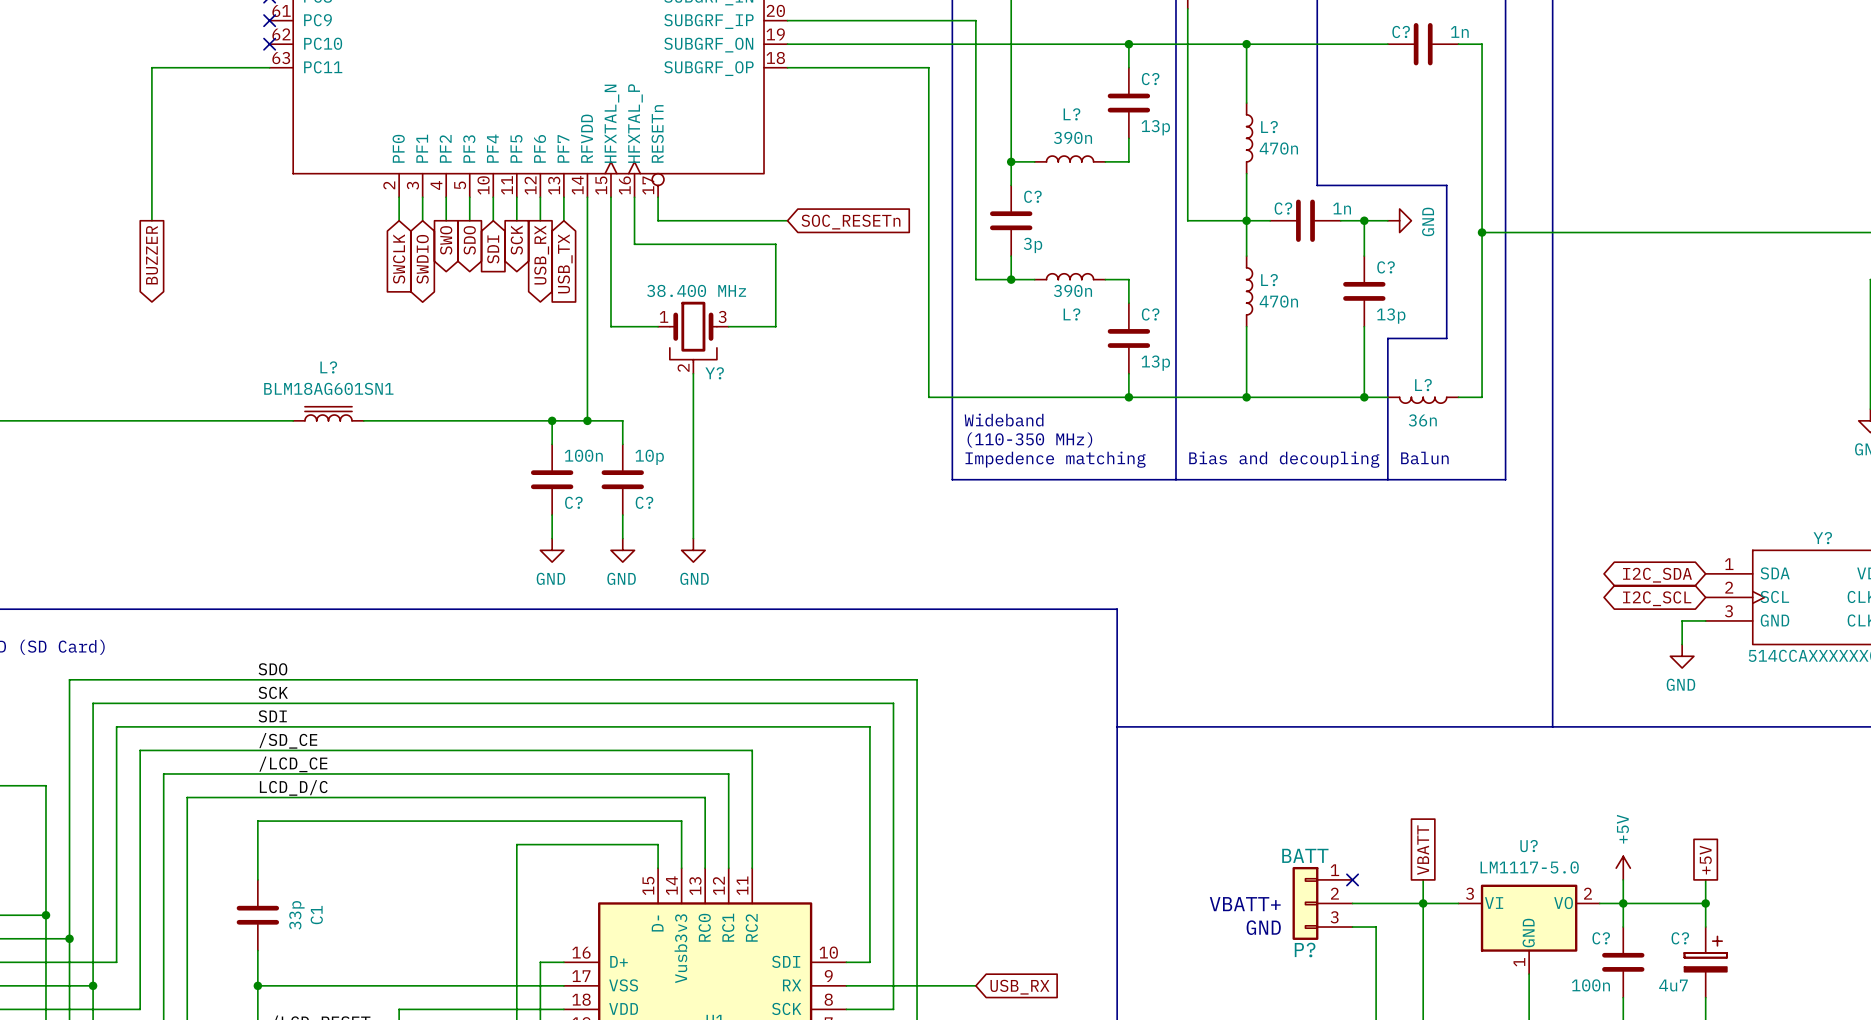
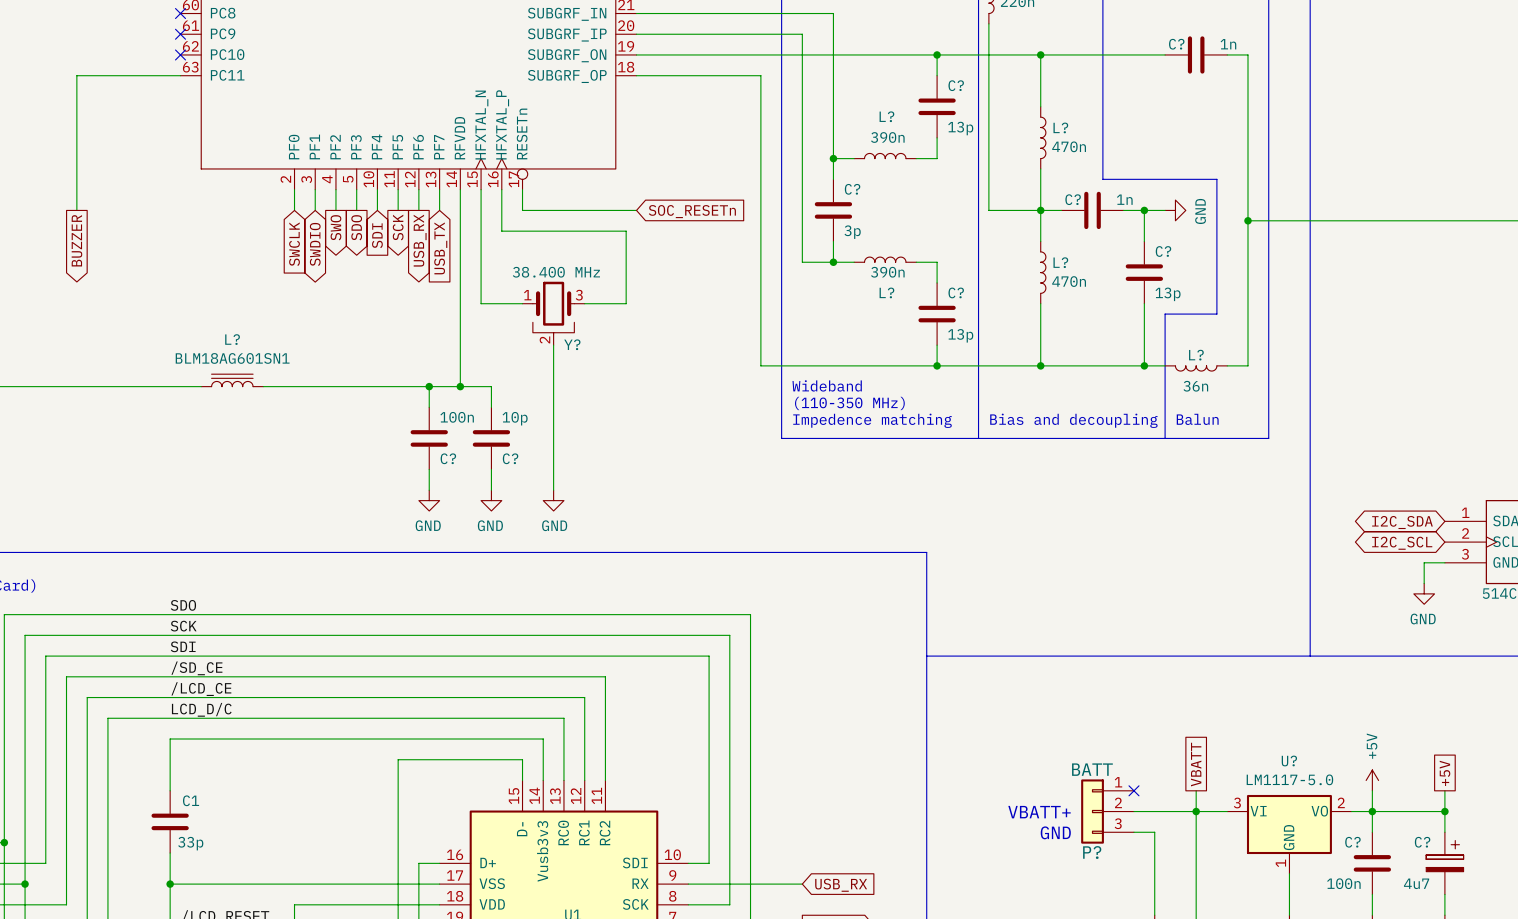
C1 value rotation: 0° (296, 915) -> 90° clockwise (190, 843)
C1 name rotation: 0° (316, 915) -> 90° clockwise (191, 800)
C1 name position: C1 (316, 915) -> C1 (191, 800)

